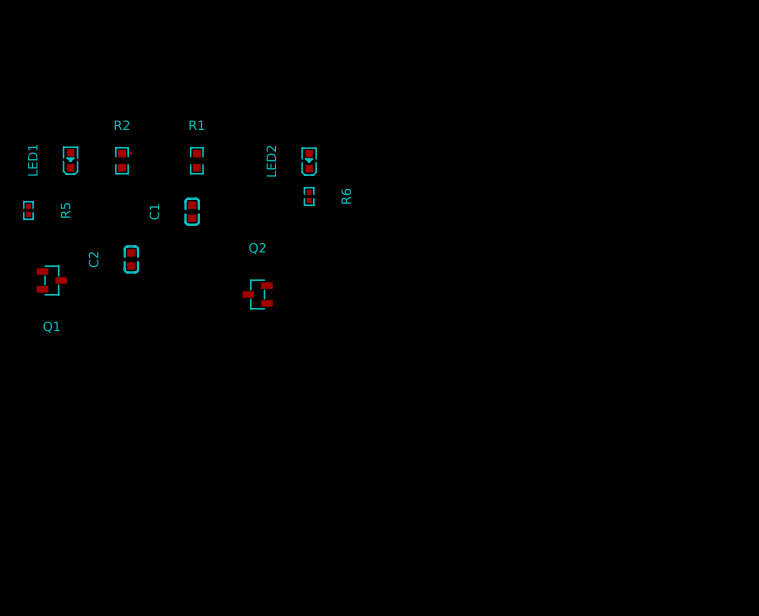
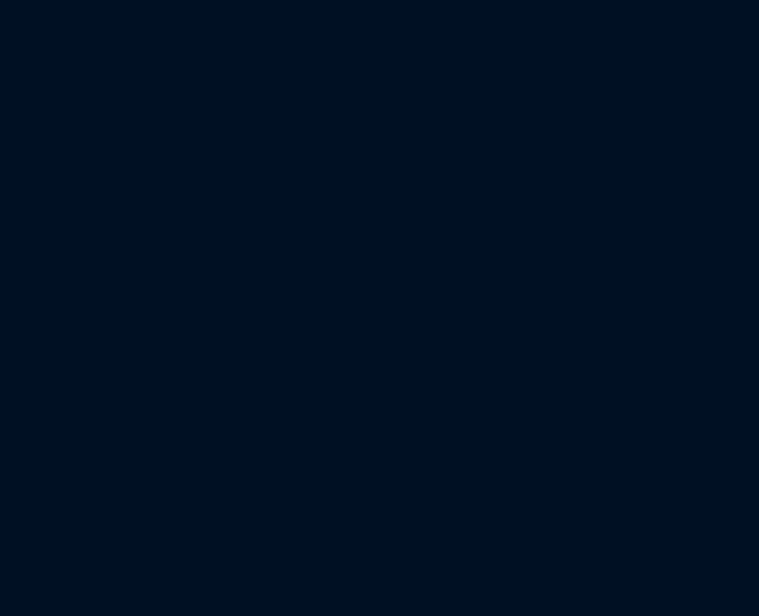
top track: (130, 152) (131, 153) -> none
LED1: (70, 160) -> none
R2: (122, 160) -> none
R1: (196, 160) -> none
LED2: (309, 161) -> none
R6: (309, 196) -> none
R5: (28, 210) -> none
C1: (192, 211) -> none
C2: (131, 259) -> none
Q1: (51, 280) -> none
Q2: (257, 294) -> none

